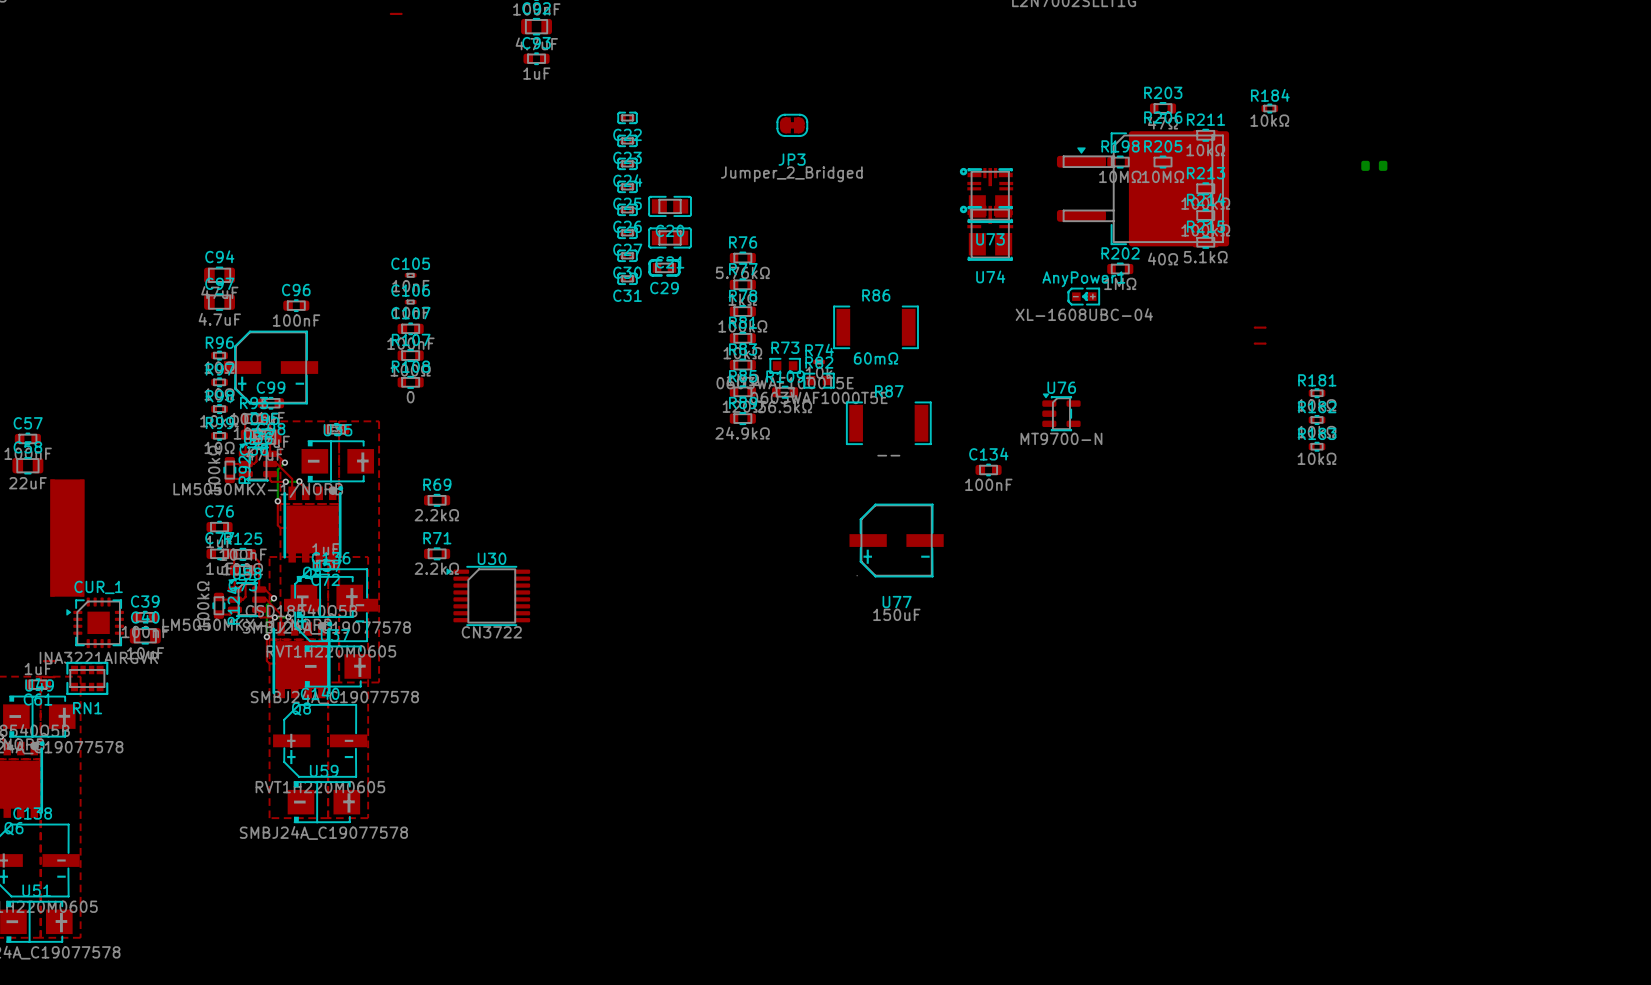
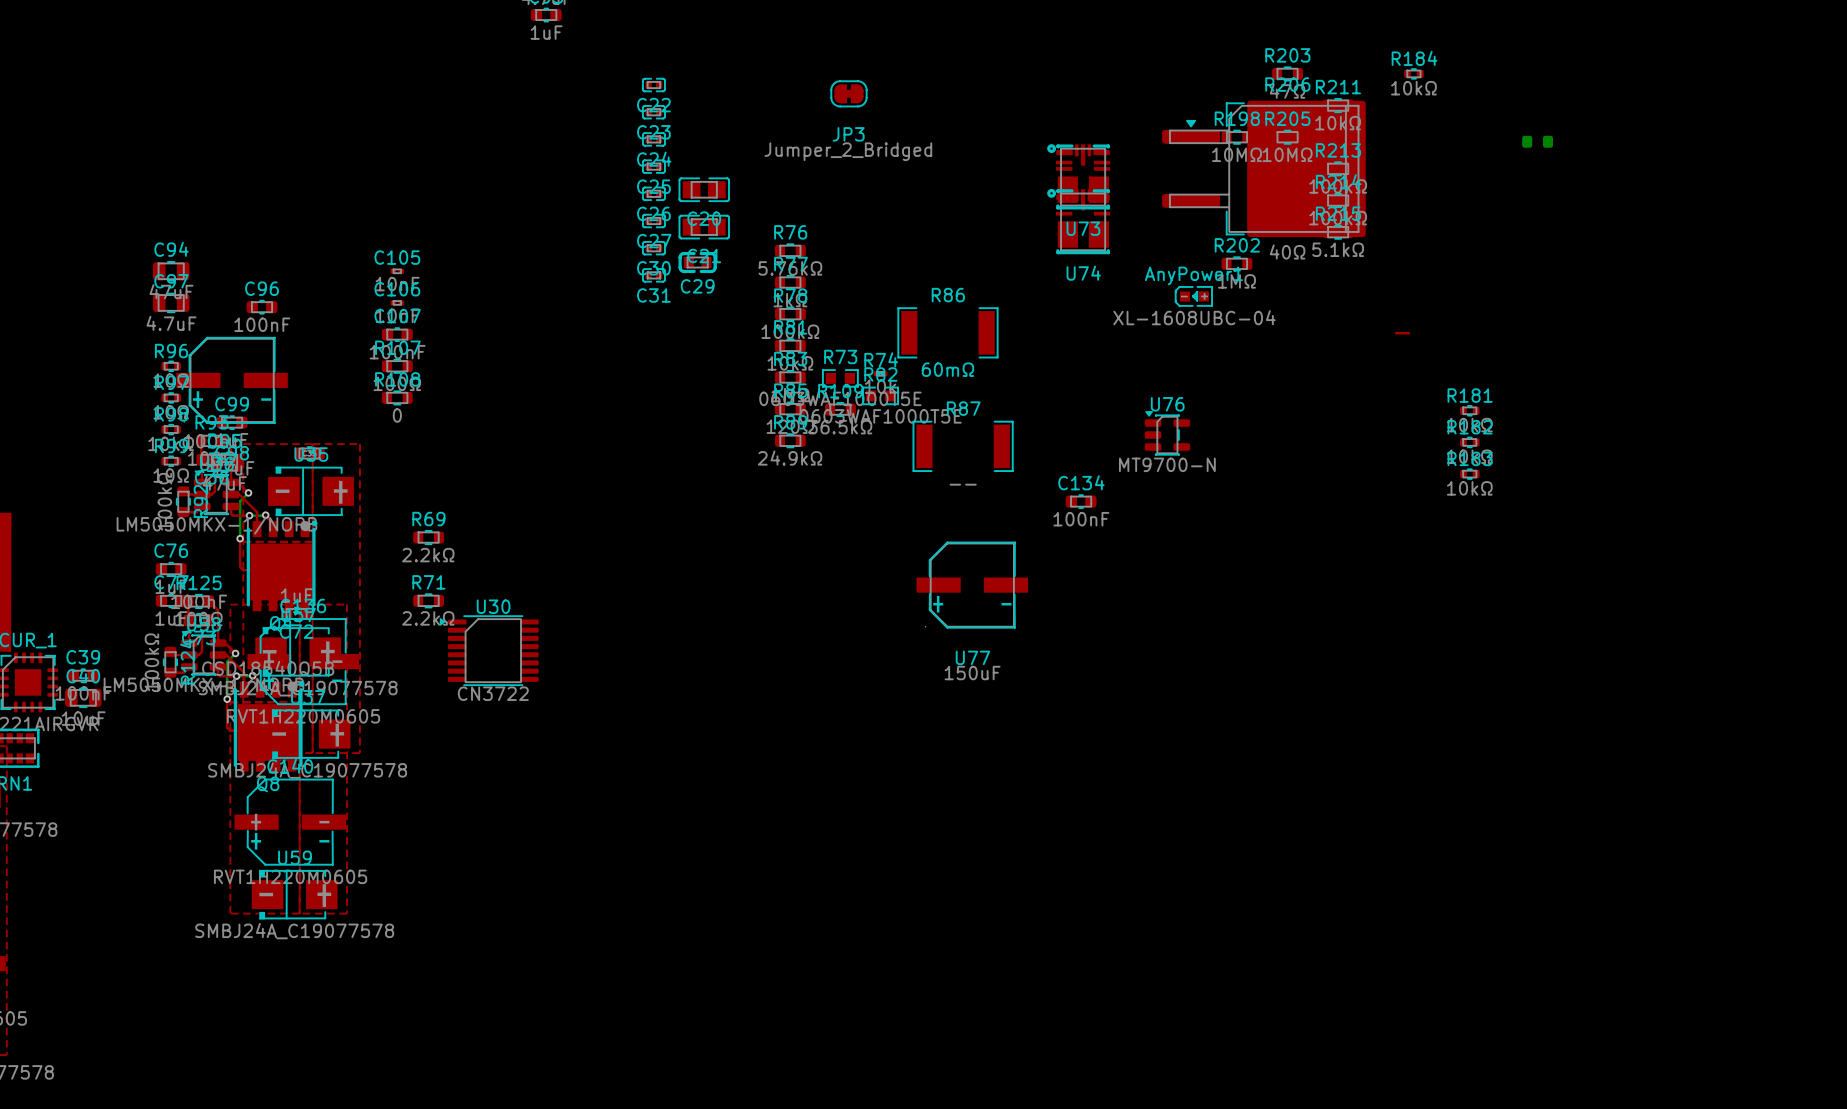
part: (1260, 343) -> none

